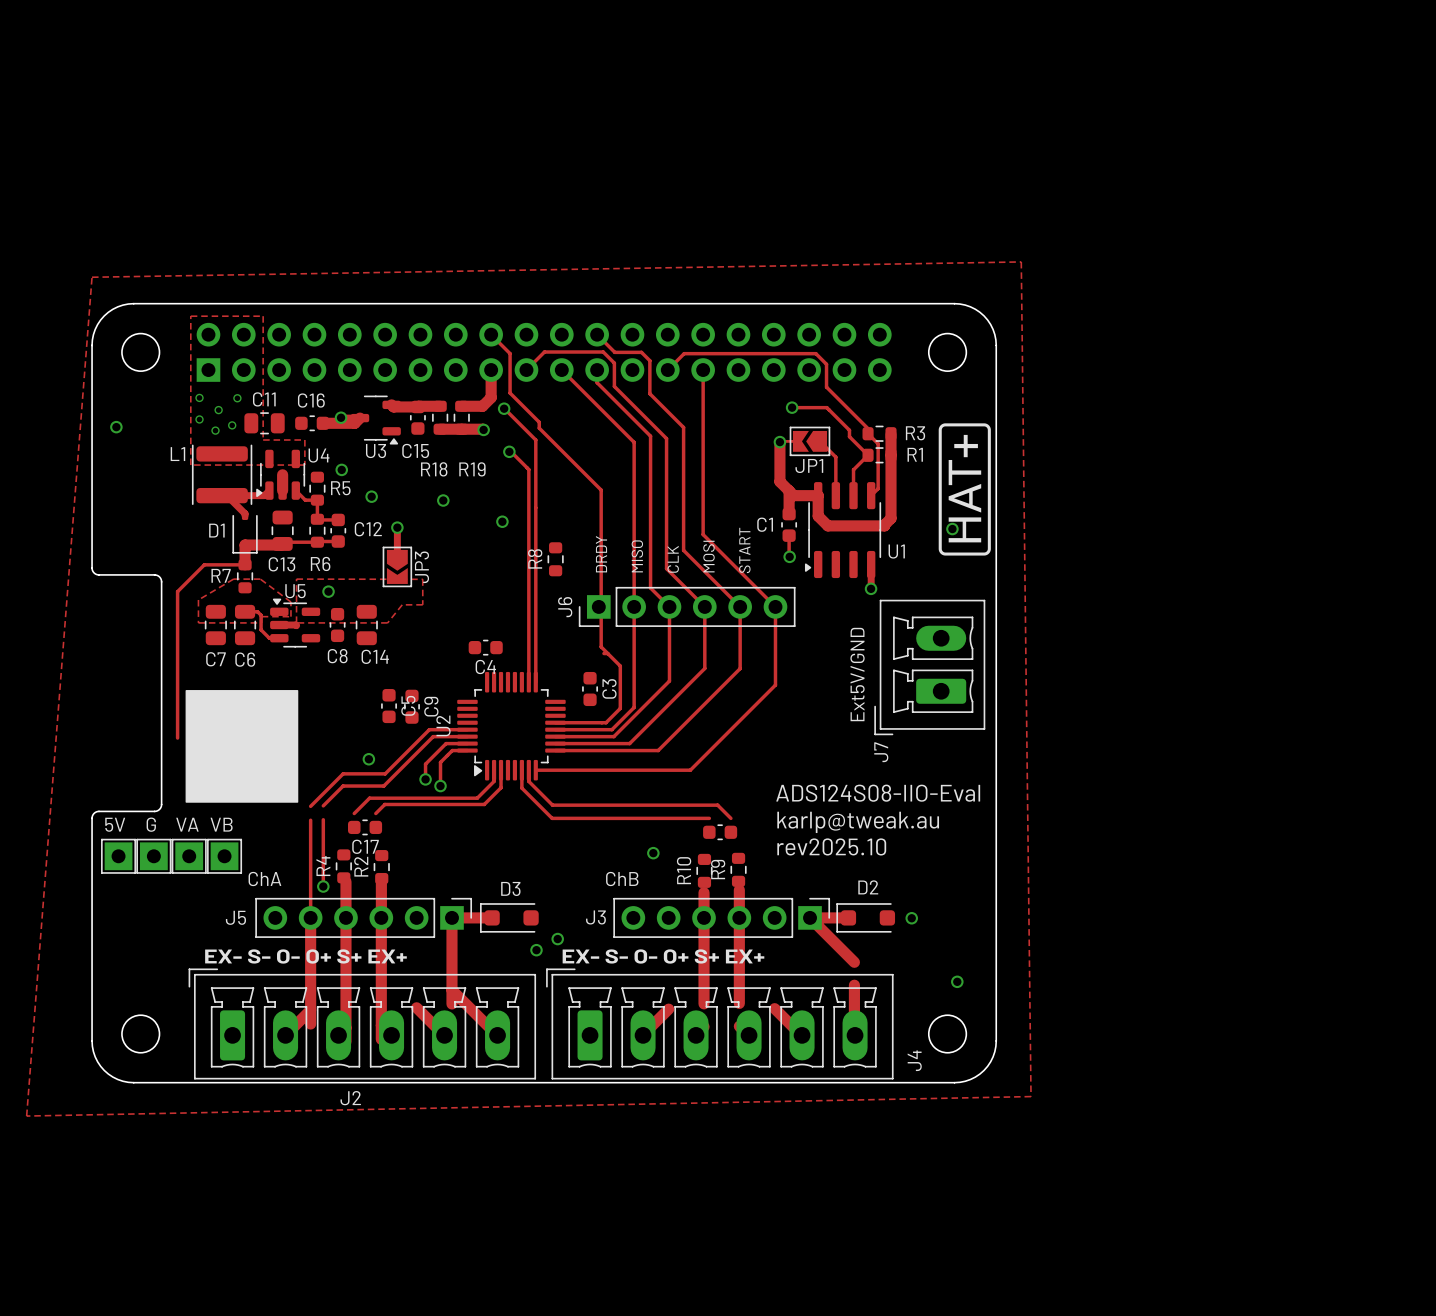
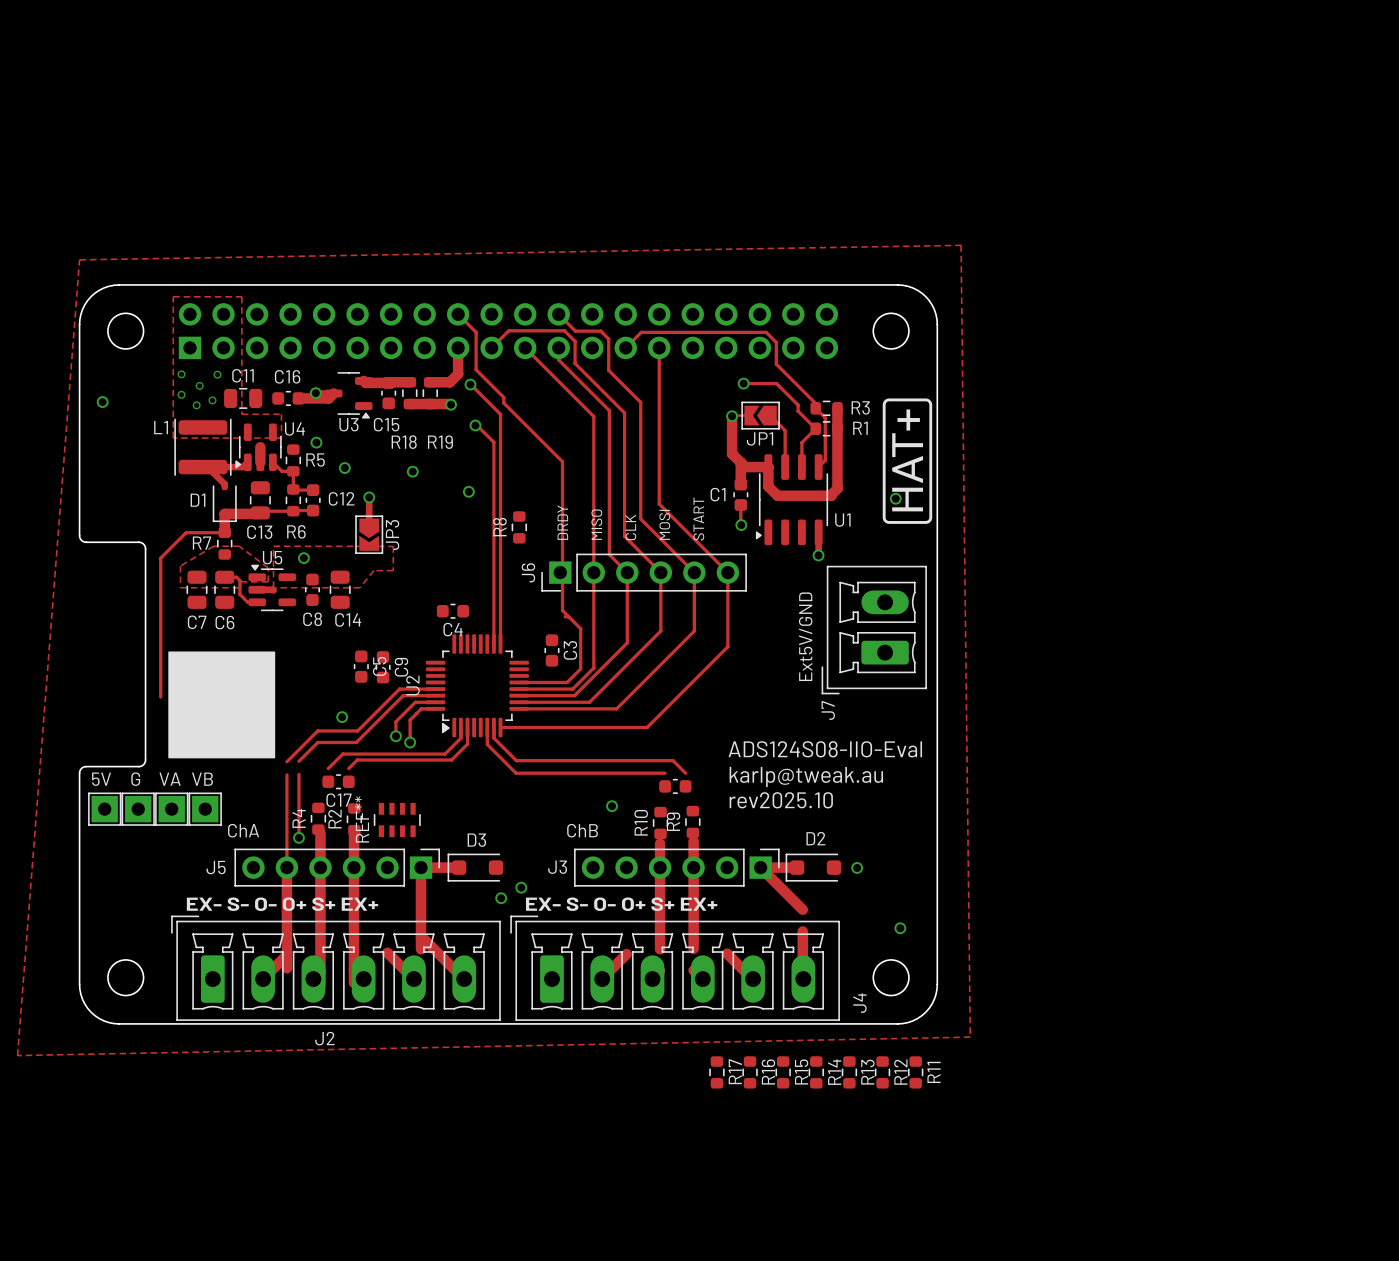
REF**: none -> (397, 820)
R17: none -> (716, 1072)
R16: none -> (750, 1072)
R15: none -> (783, 1072)
R14: none -> (816, 1072)
R13: none -> (849, 1072)
R12: none -> (882, 1072)
R11: none -> (915, 1072)

